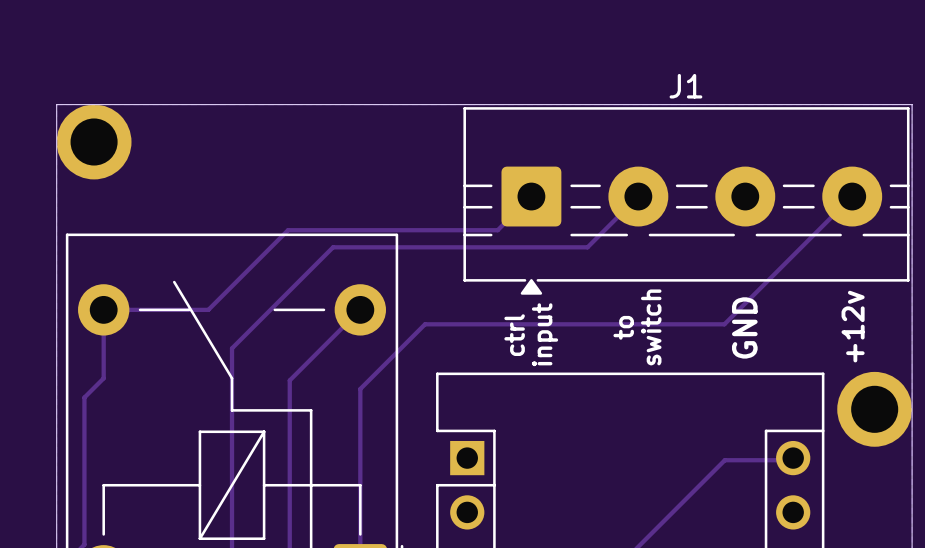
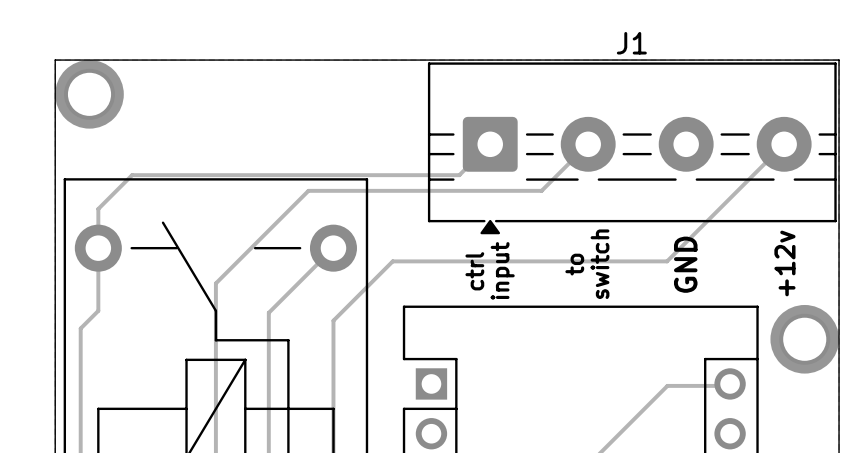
track: (288, 230) (208, 309) (103, 309) -> (267, 175) (132, 175) (98, 208) (98, 248)

